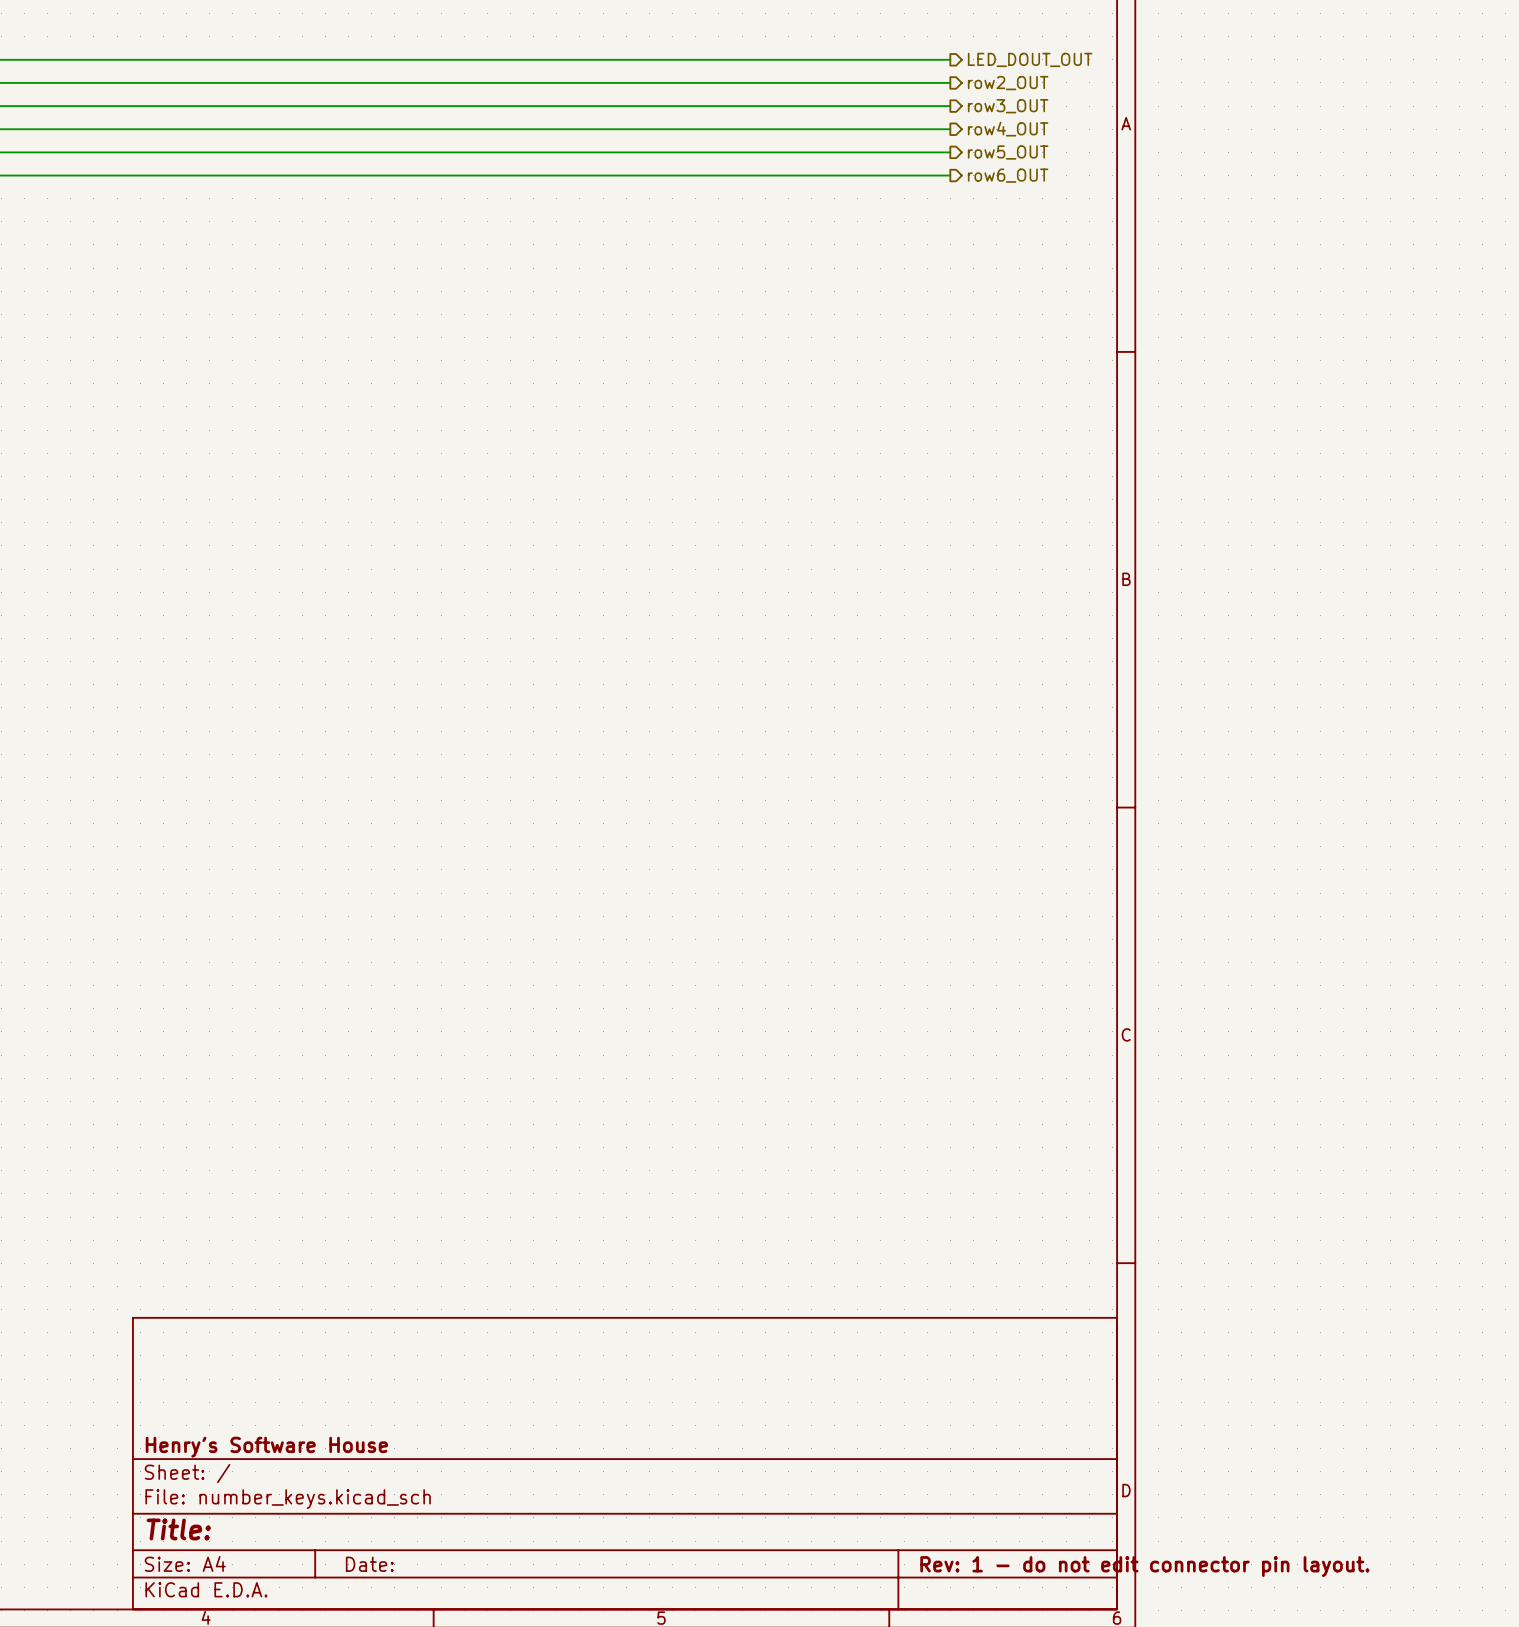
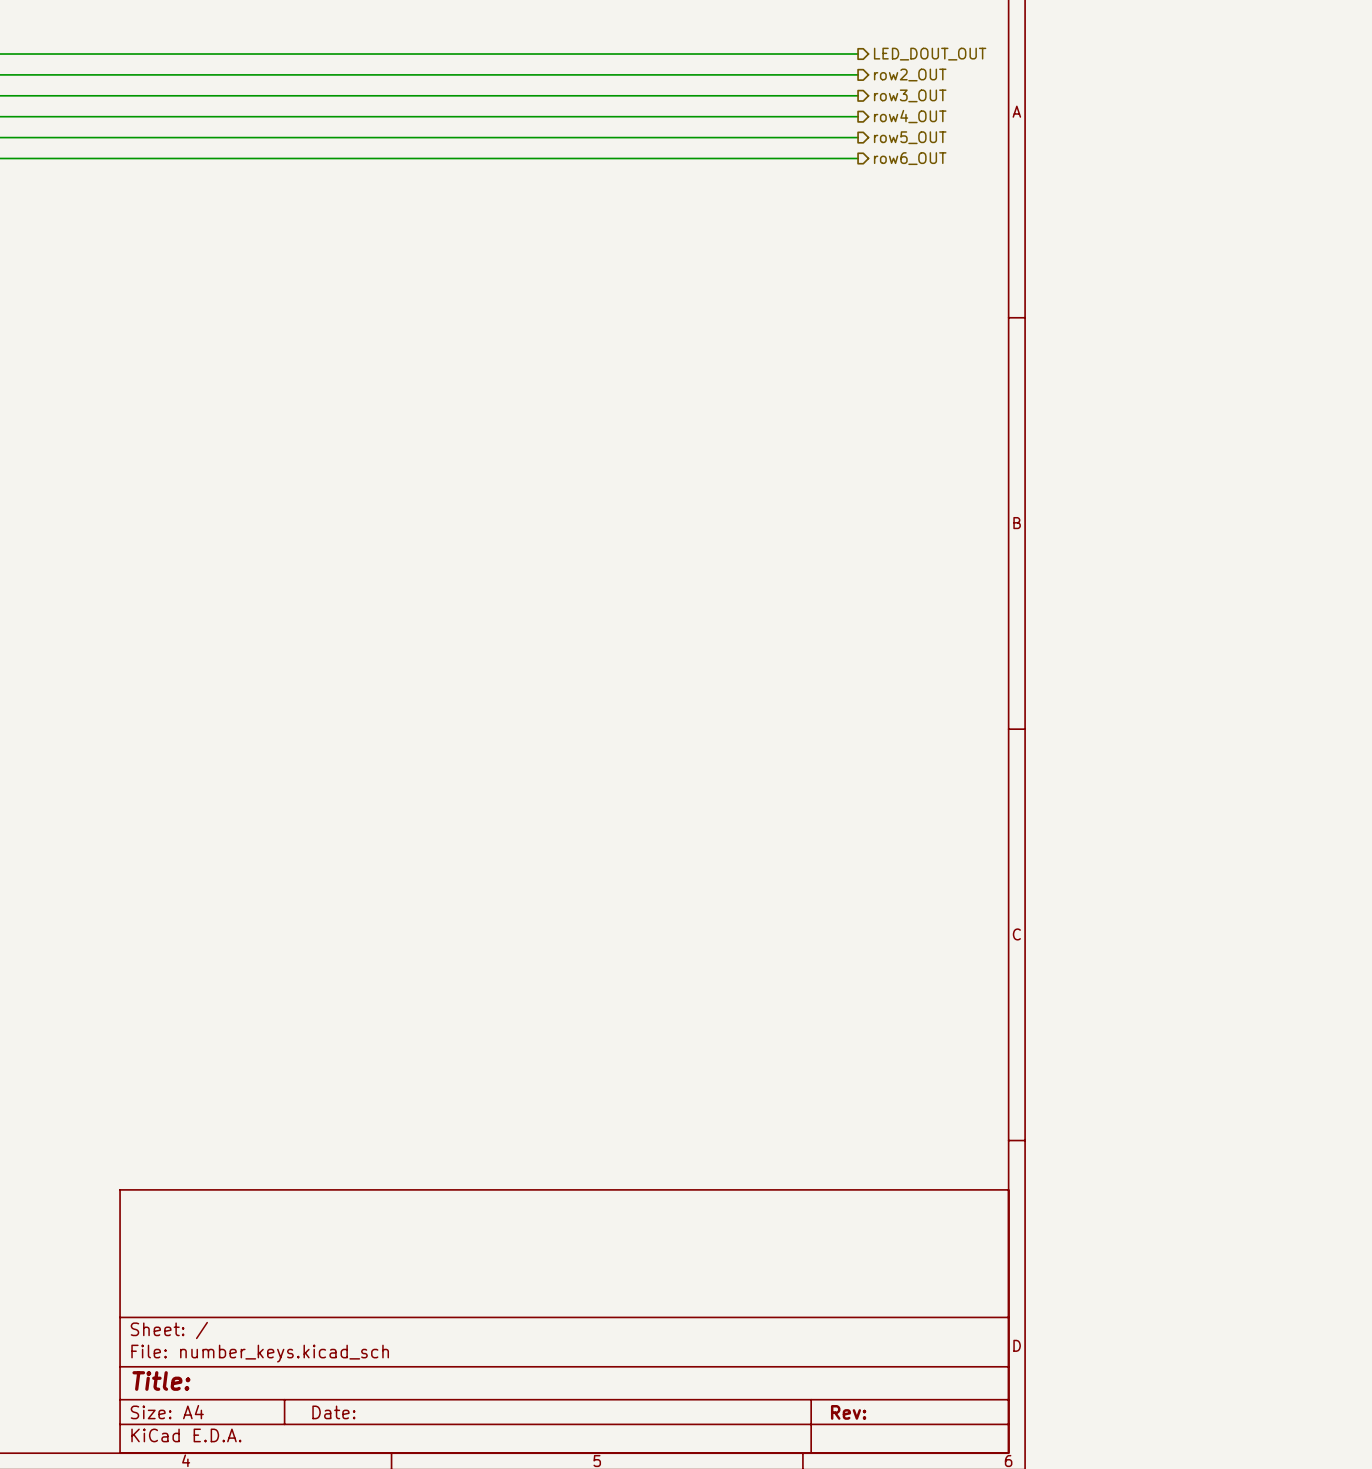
title block: Henry's Software House (266, 1447) -> none
title block: Rev: 1 - do not edit connector pin layout. (1144, 1566) -> Rev: (848, 1412)

